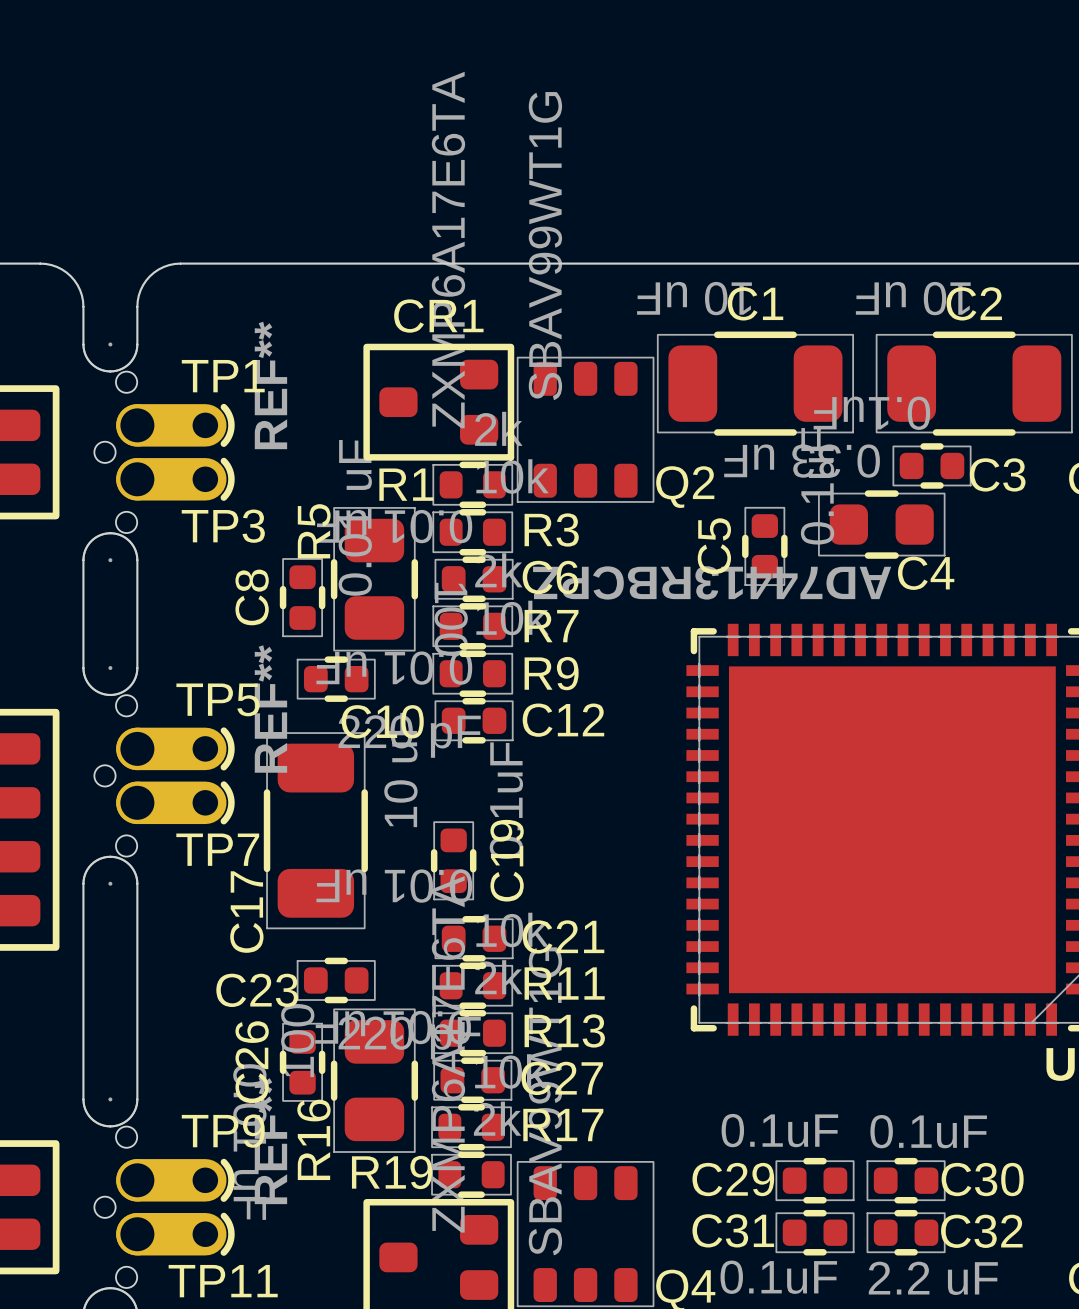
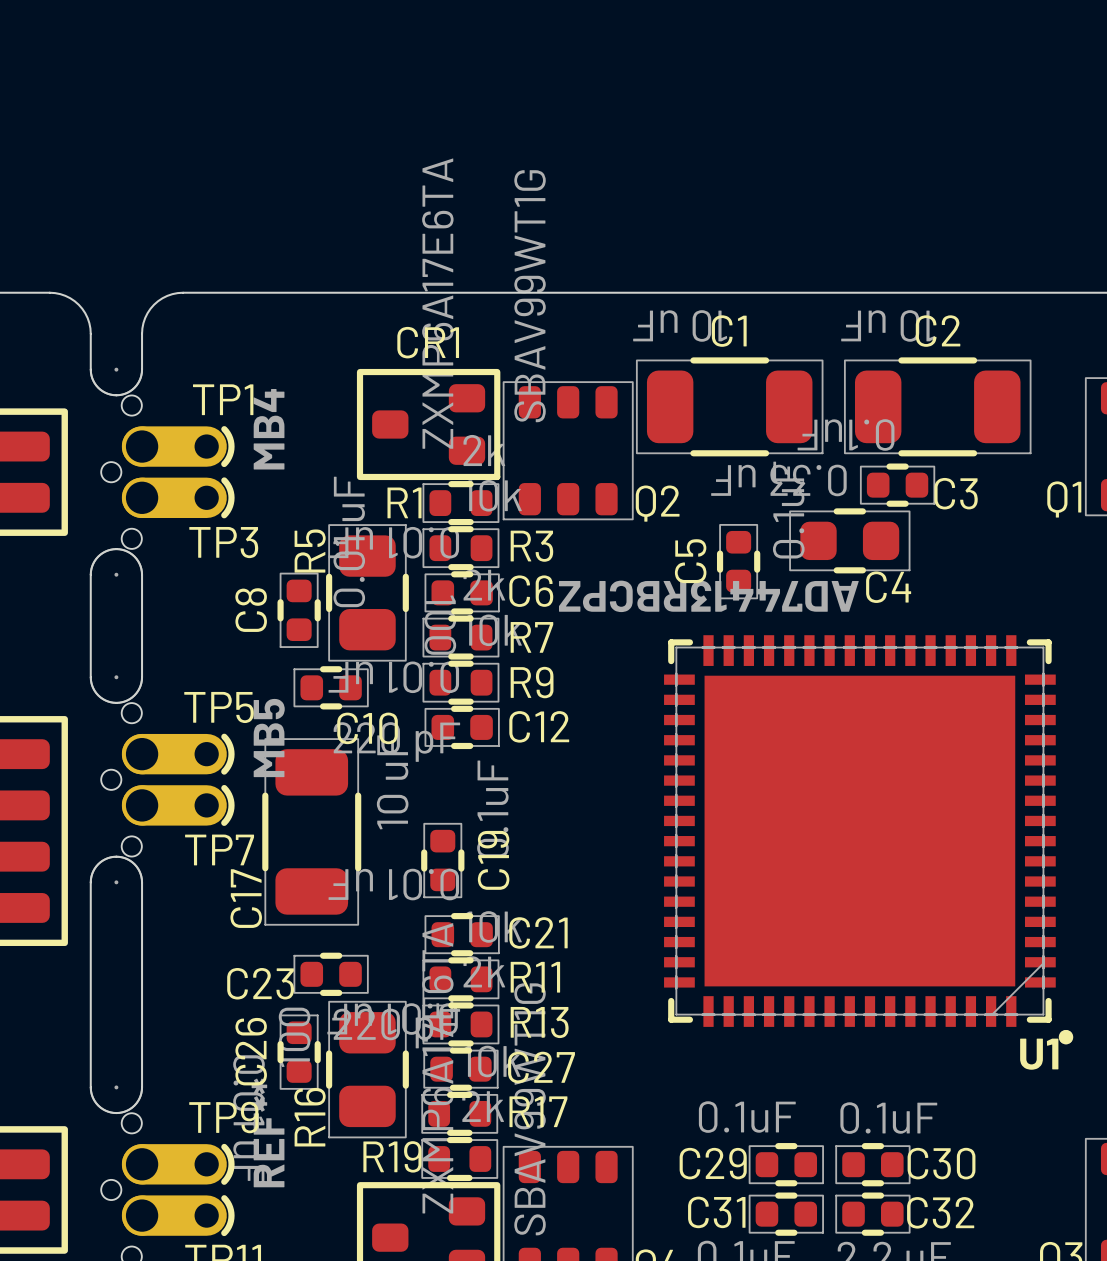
REF** name: REF** (270, 385) -> MB4 (269, 429)
REF** name: REF** (270, 709) -> MB5 (269, 738)

